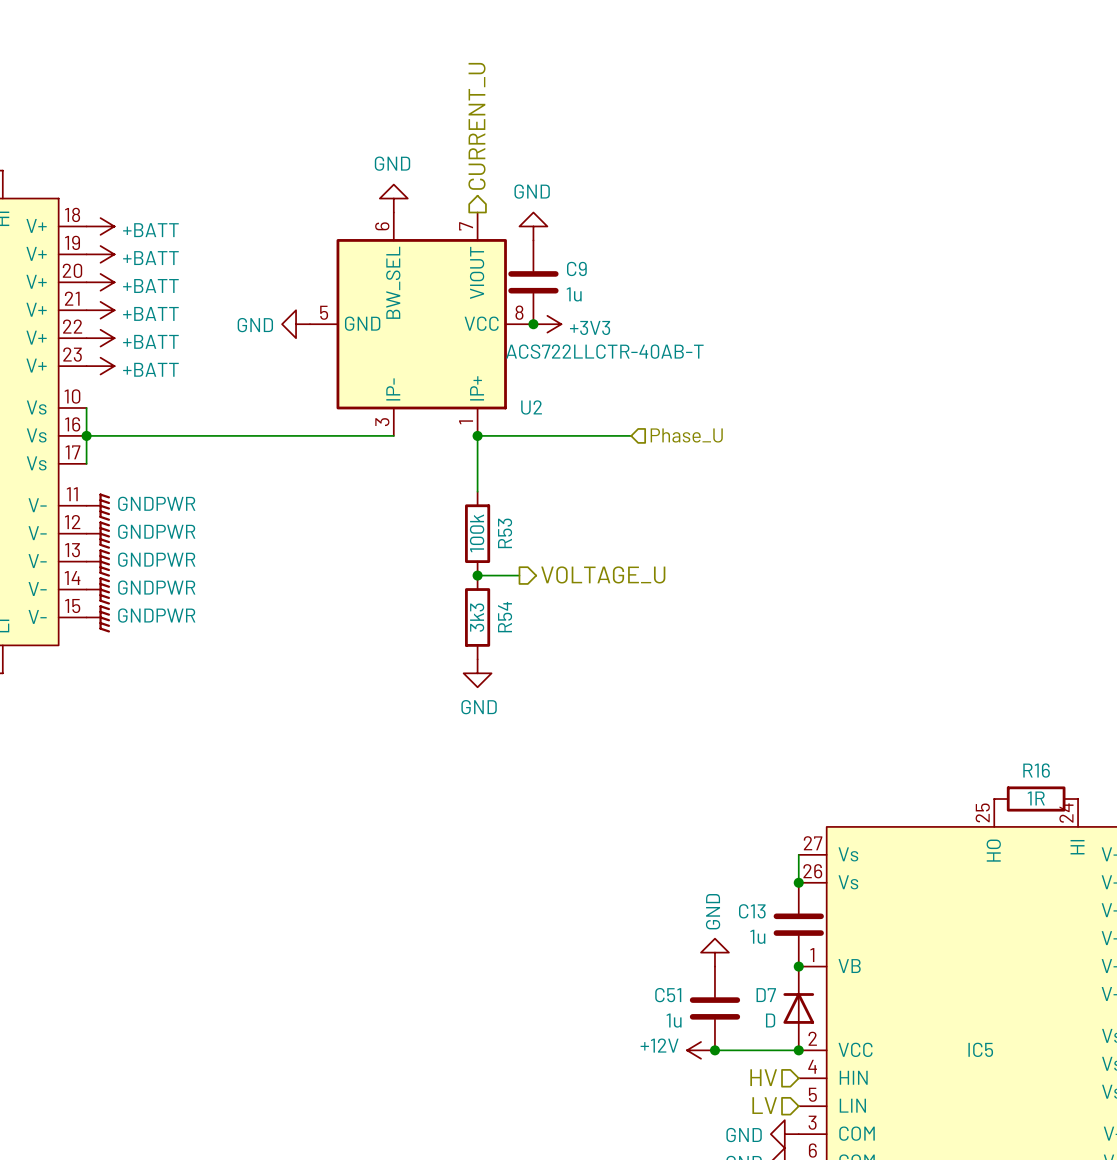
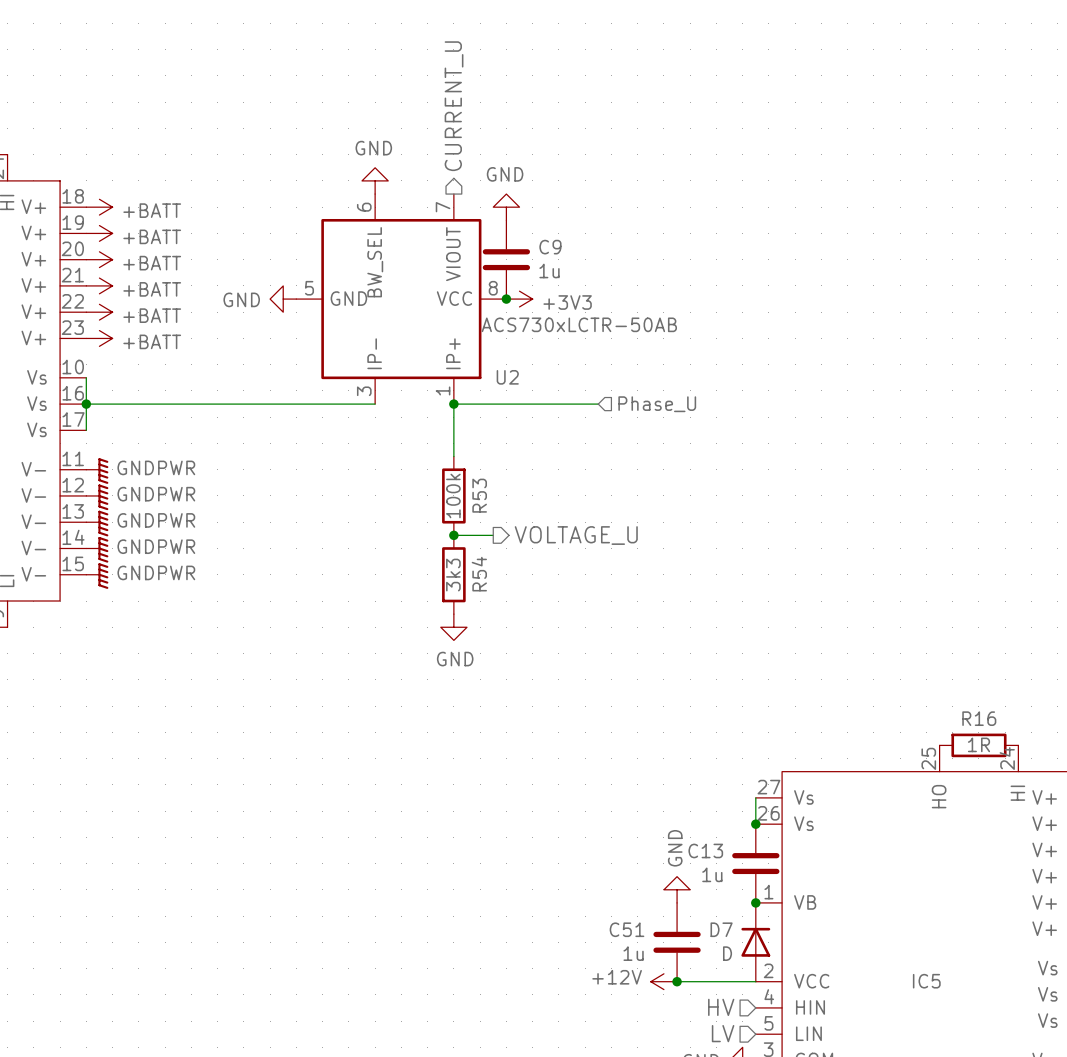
U2 value: ACS722LLCTR-40AB-T (604, 351) -> ACS730xLCTR-50AB (579, 324)
junction: (798, 1050) -> none

